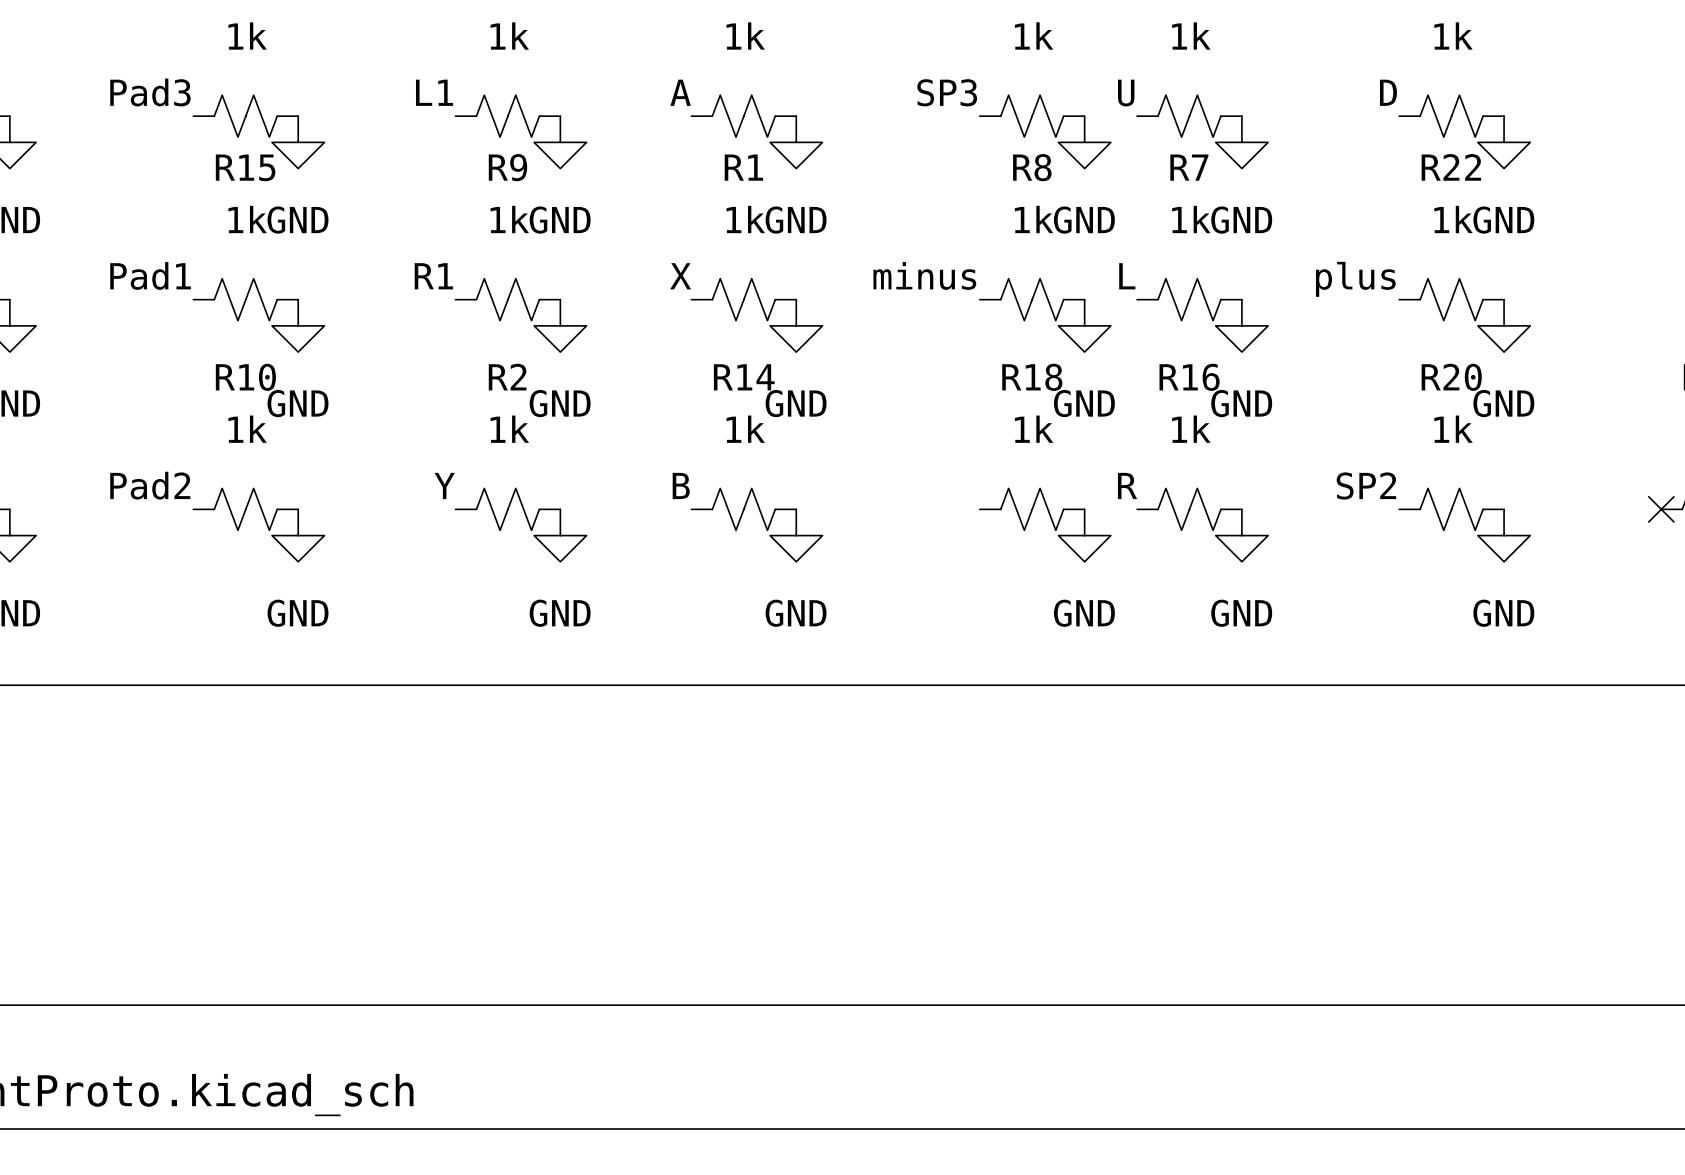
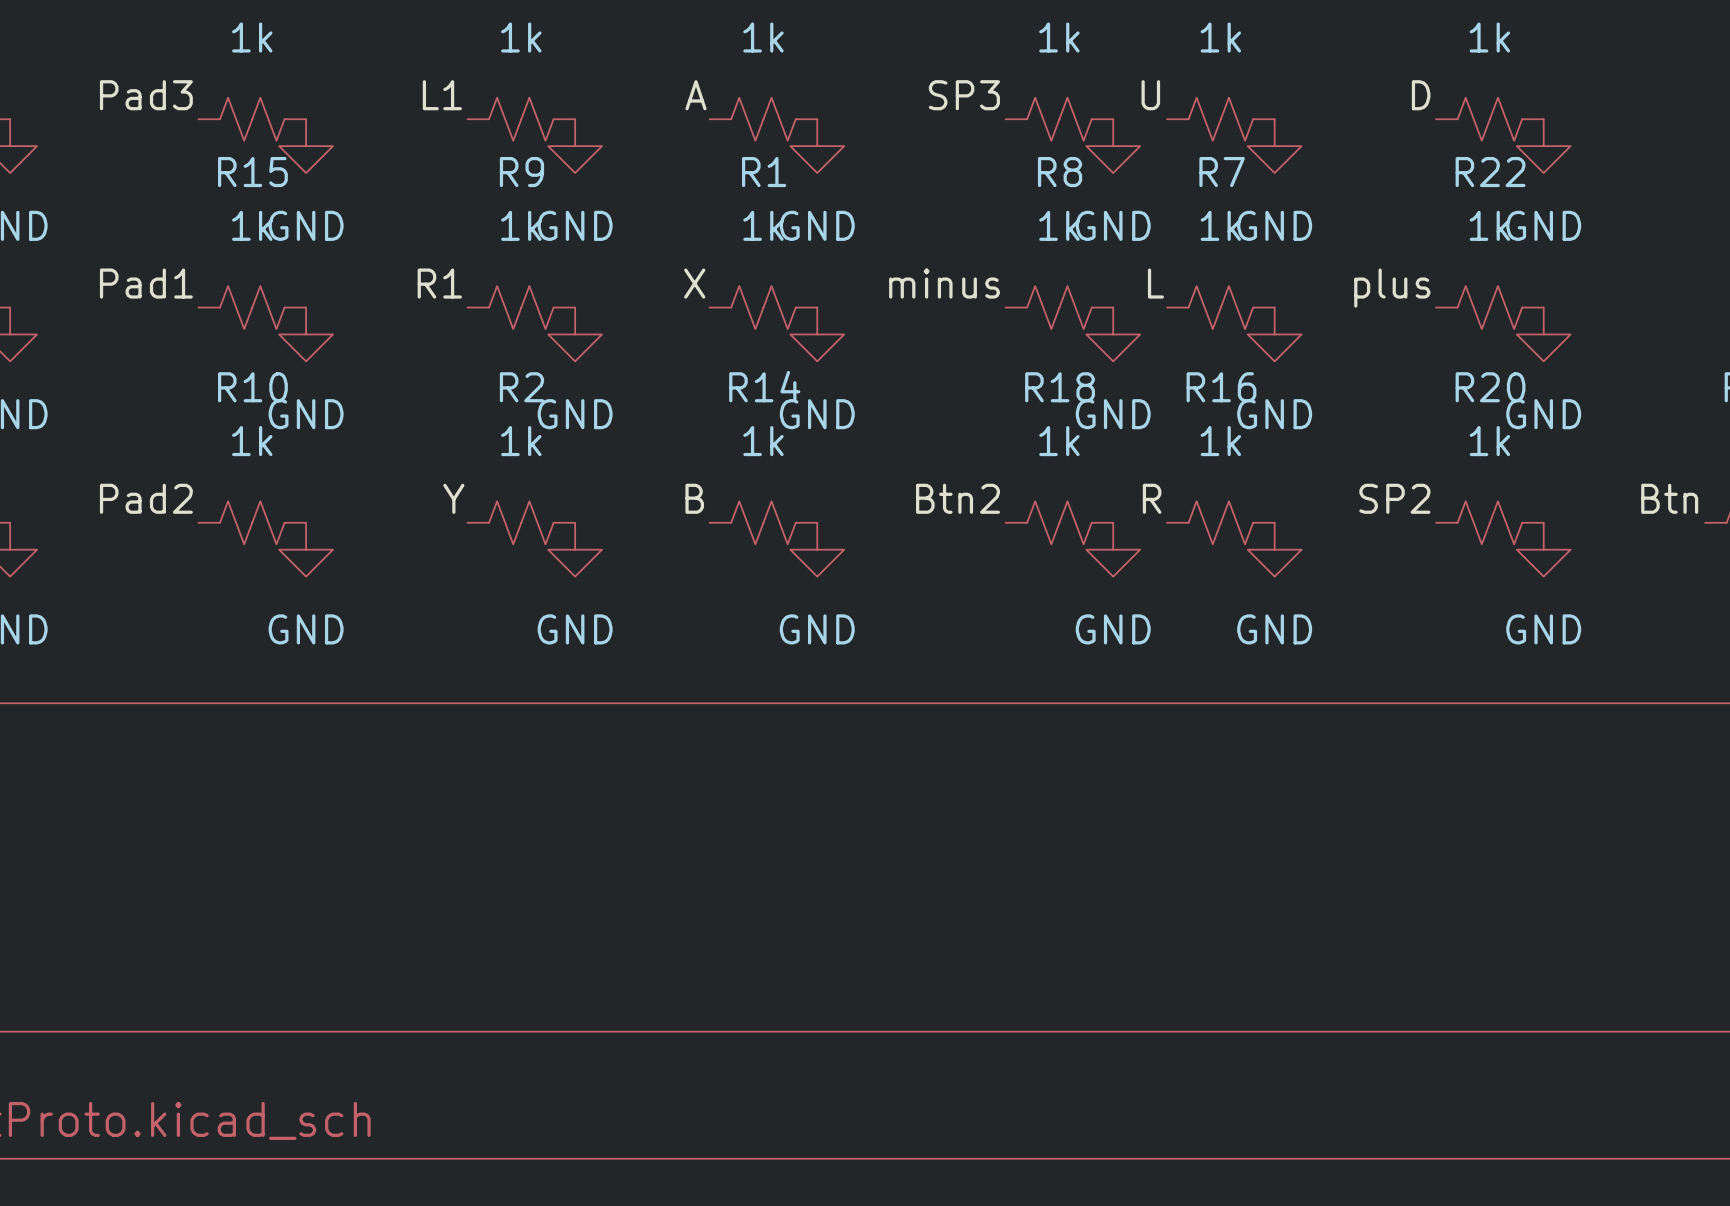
label: none -> Btn2 (958, 498)
label: none -> Btn (1669, 498)
no-connect mark: (1661, 509) -> none

